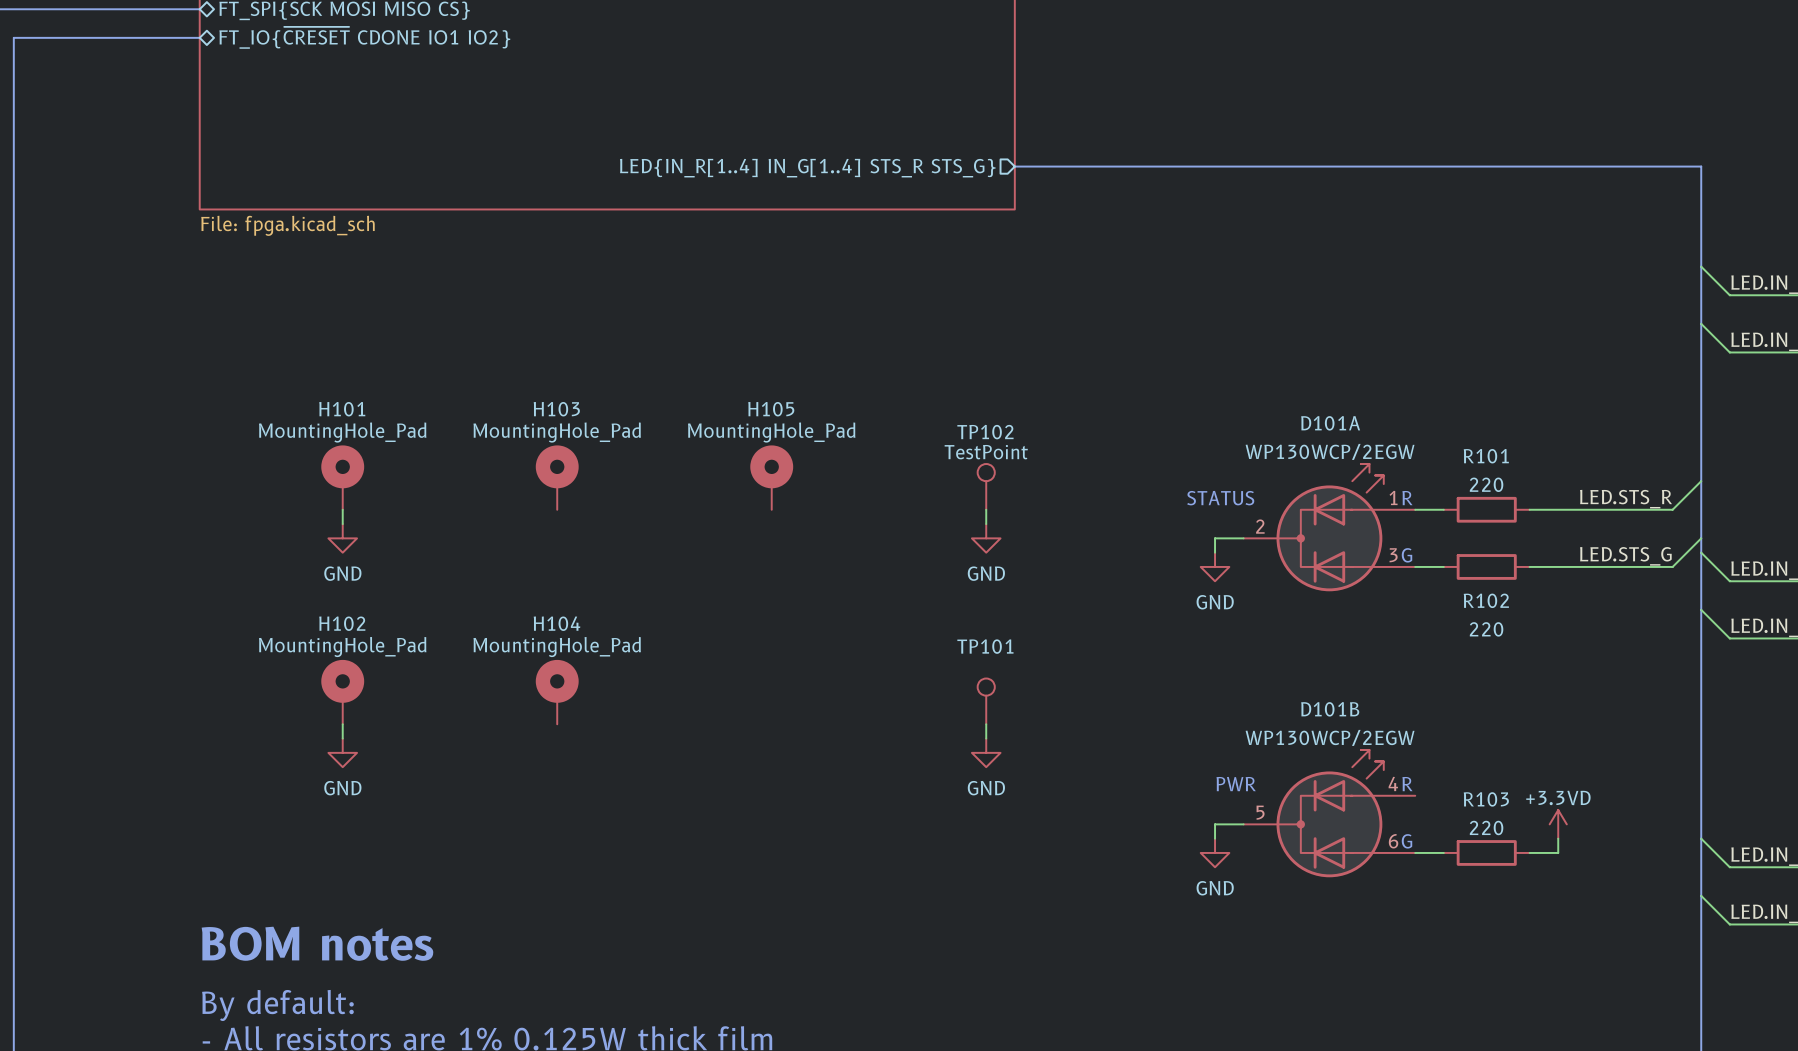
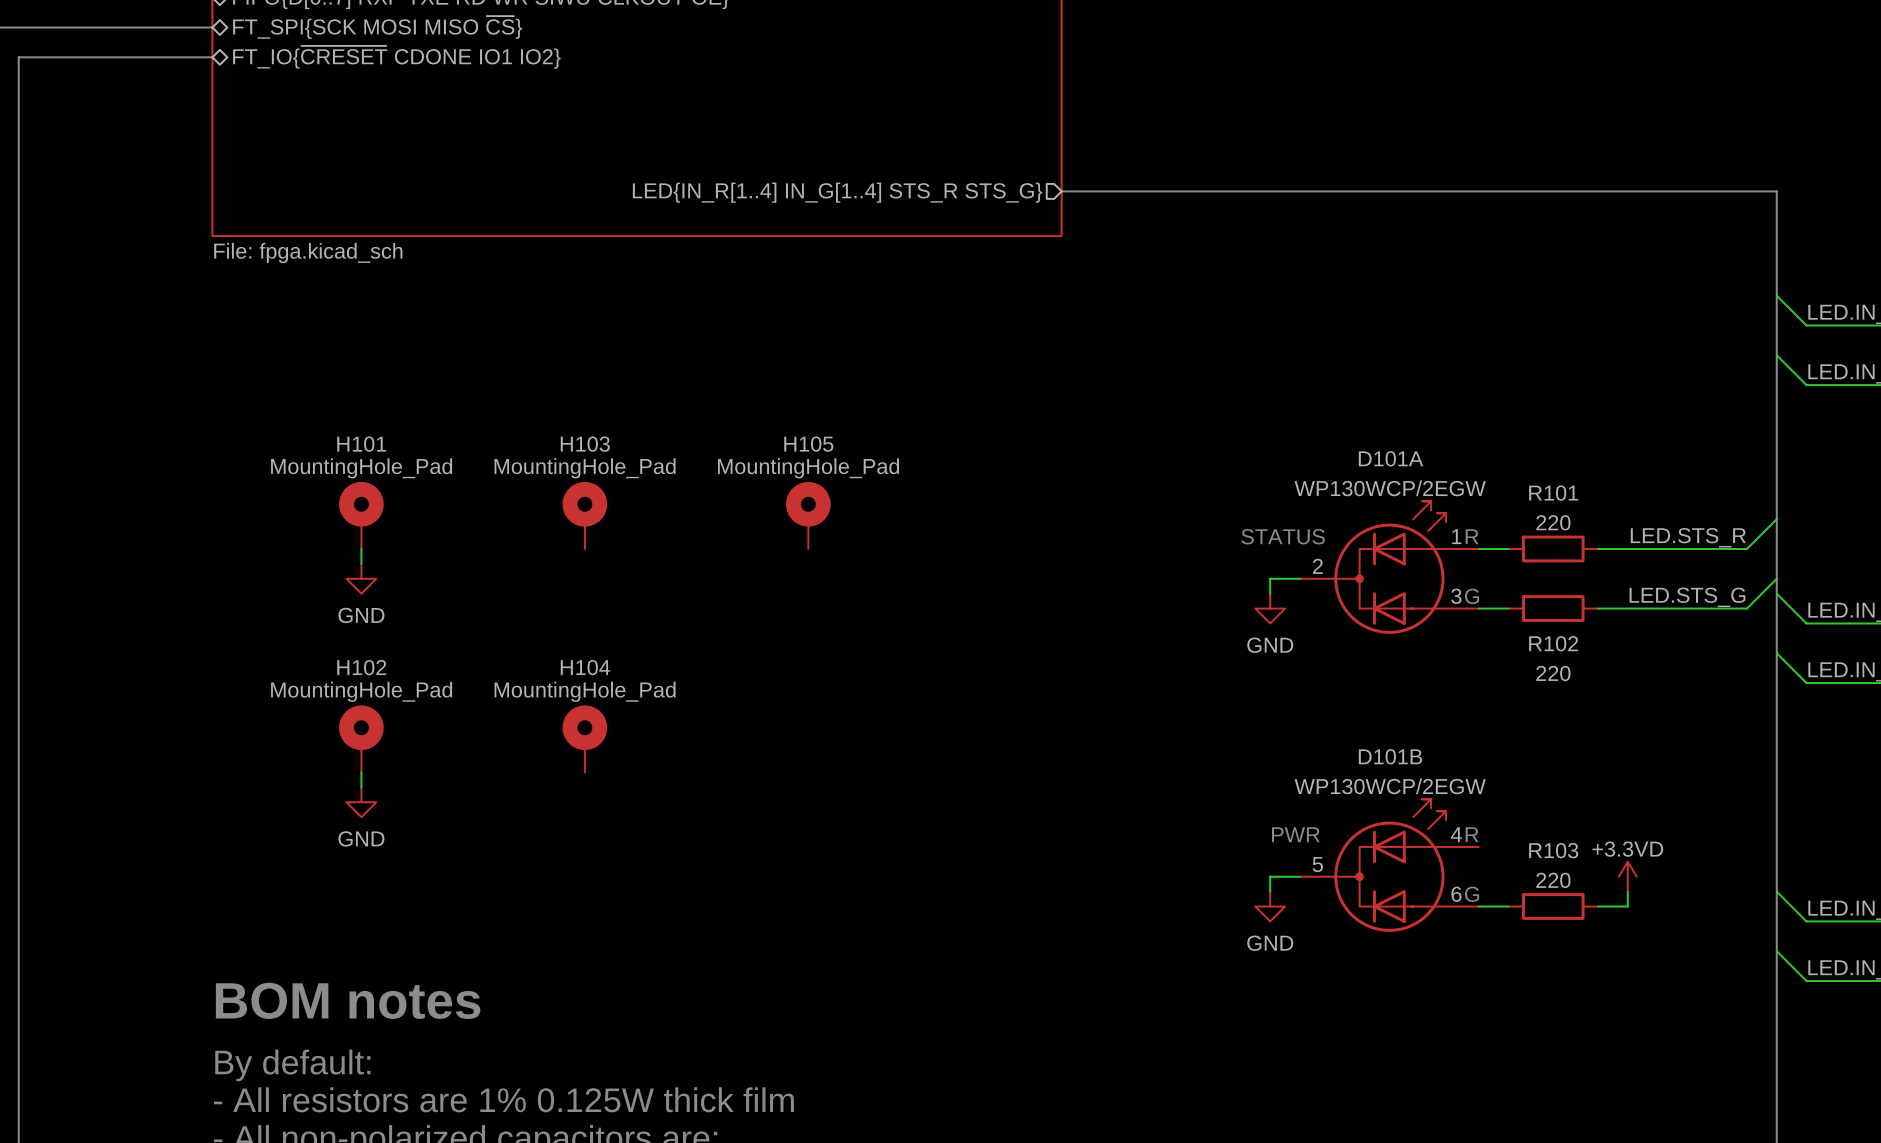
TP102: TestPoint (986, 486) -> none
wire: (986, 509) (986, 524) -> none
power symbol: GND (986, 538) -> none
TP101: (986, 701) -> none
wire: (986, 724) (986, 738) -> none
power symbol: GND (986, 752) -> none

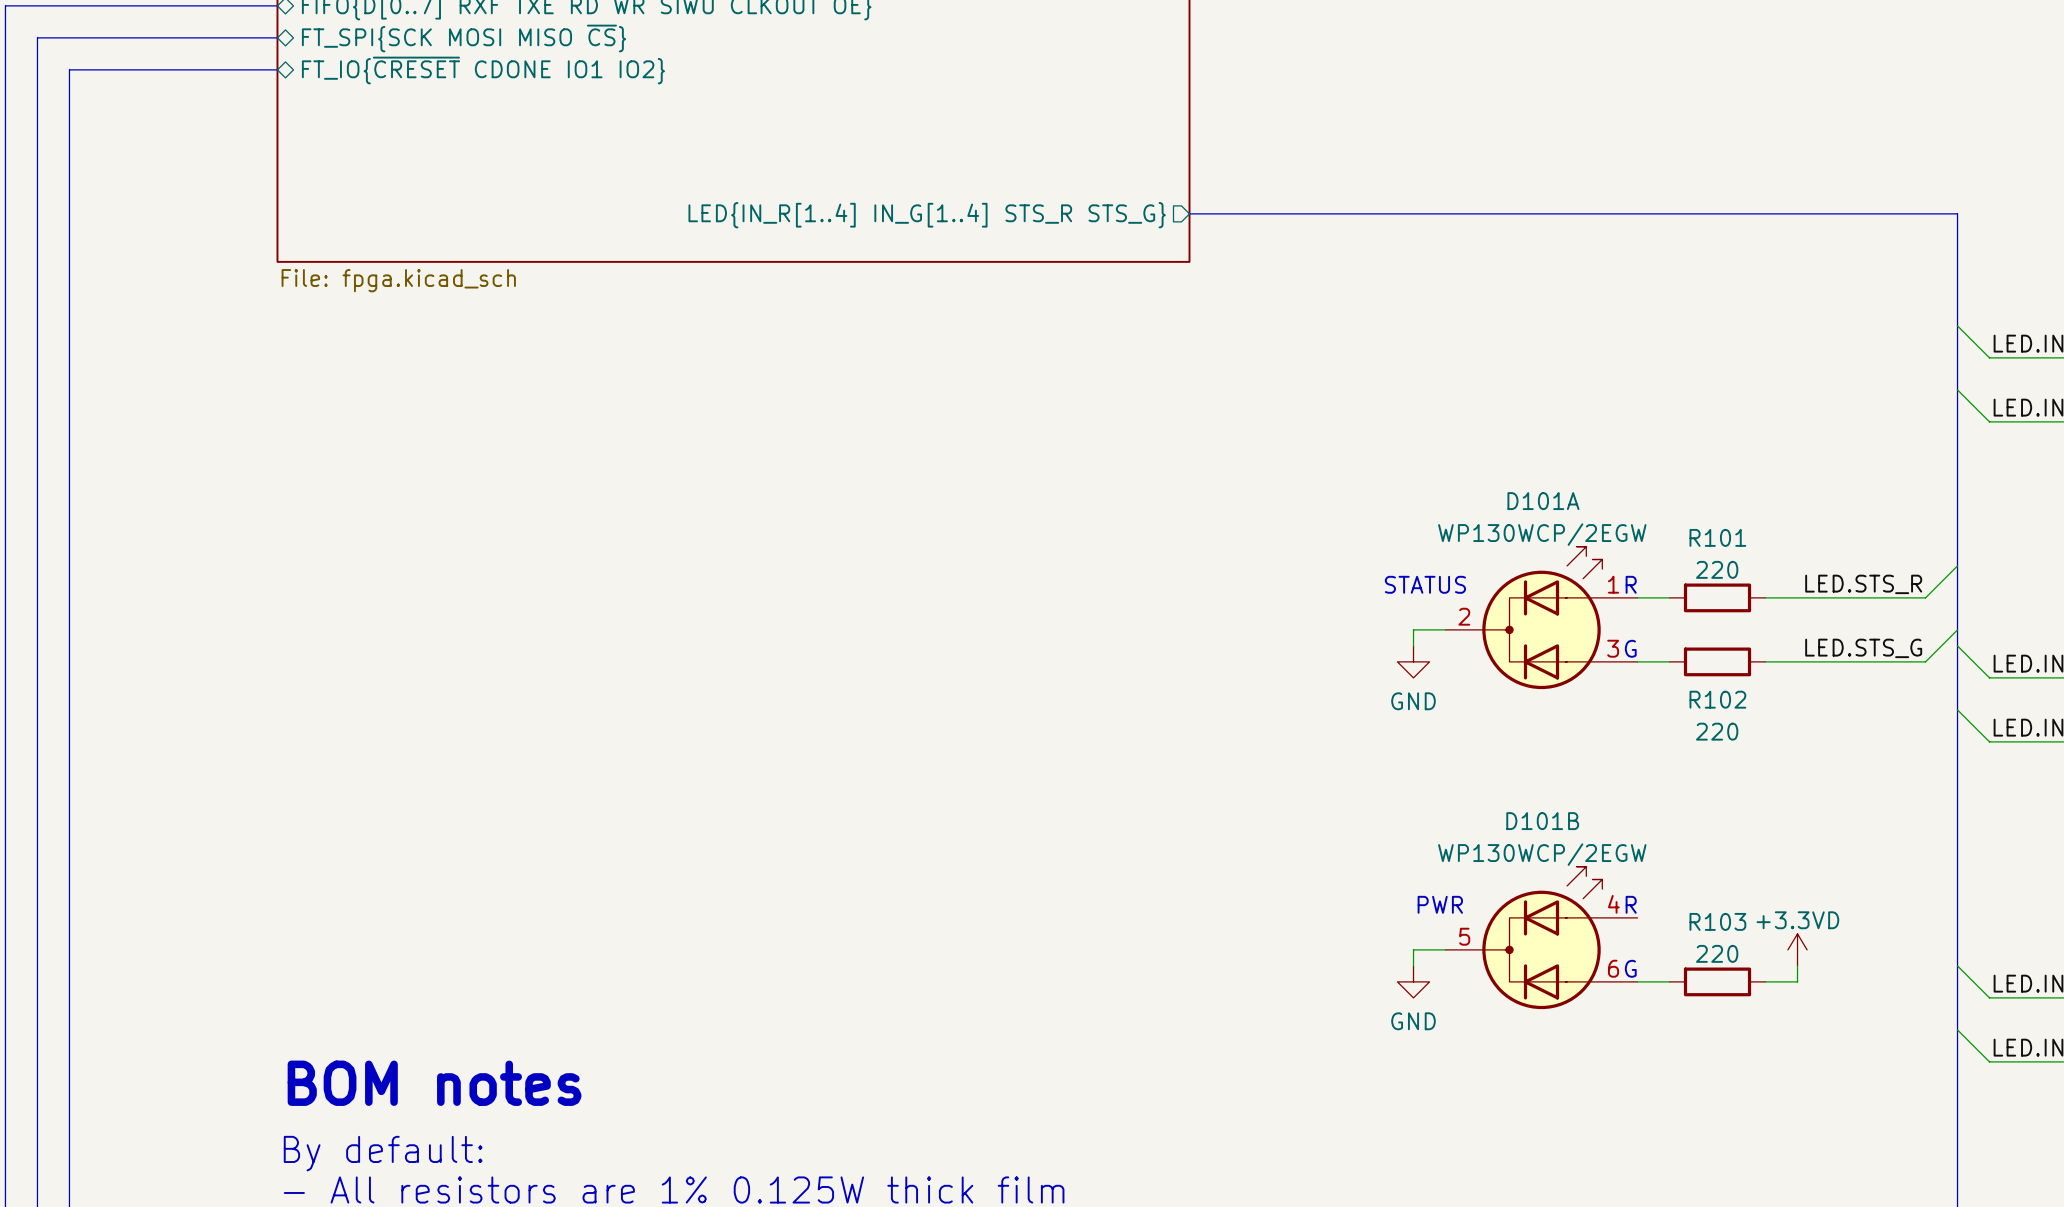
H101: MountingHole_Pad (361, 515) -> none
H103: MountingHole_Pad (584, 515) -> none
H105: MountingHole_Pad (808, 515) -> none
wire: (361, 548) (361, 563) -> none
power symbol: GND (361, 578) -> none
H102: MountingHole_Pad (361, 738) -> none
H104: MountingHole_Pad (584, 738) -> none
wire: (361, 772) (361, 787) -> none
power symbol: GND (361, 802) -> none

